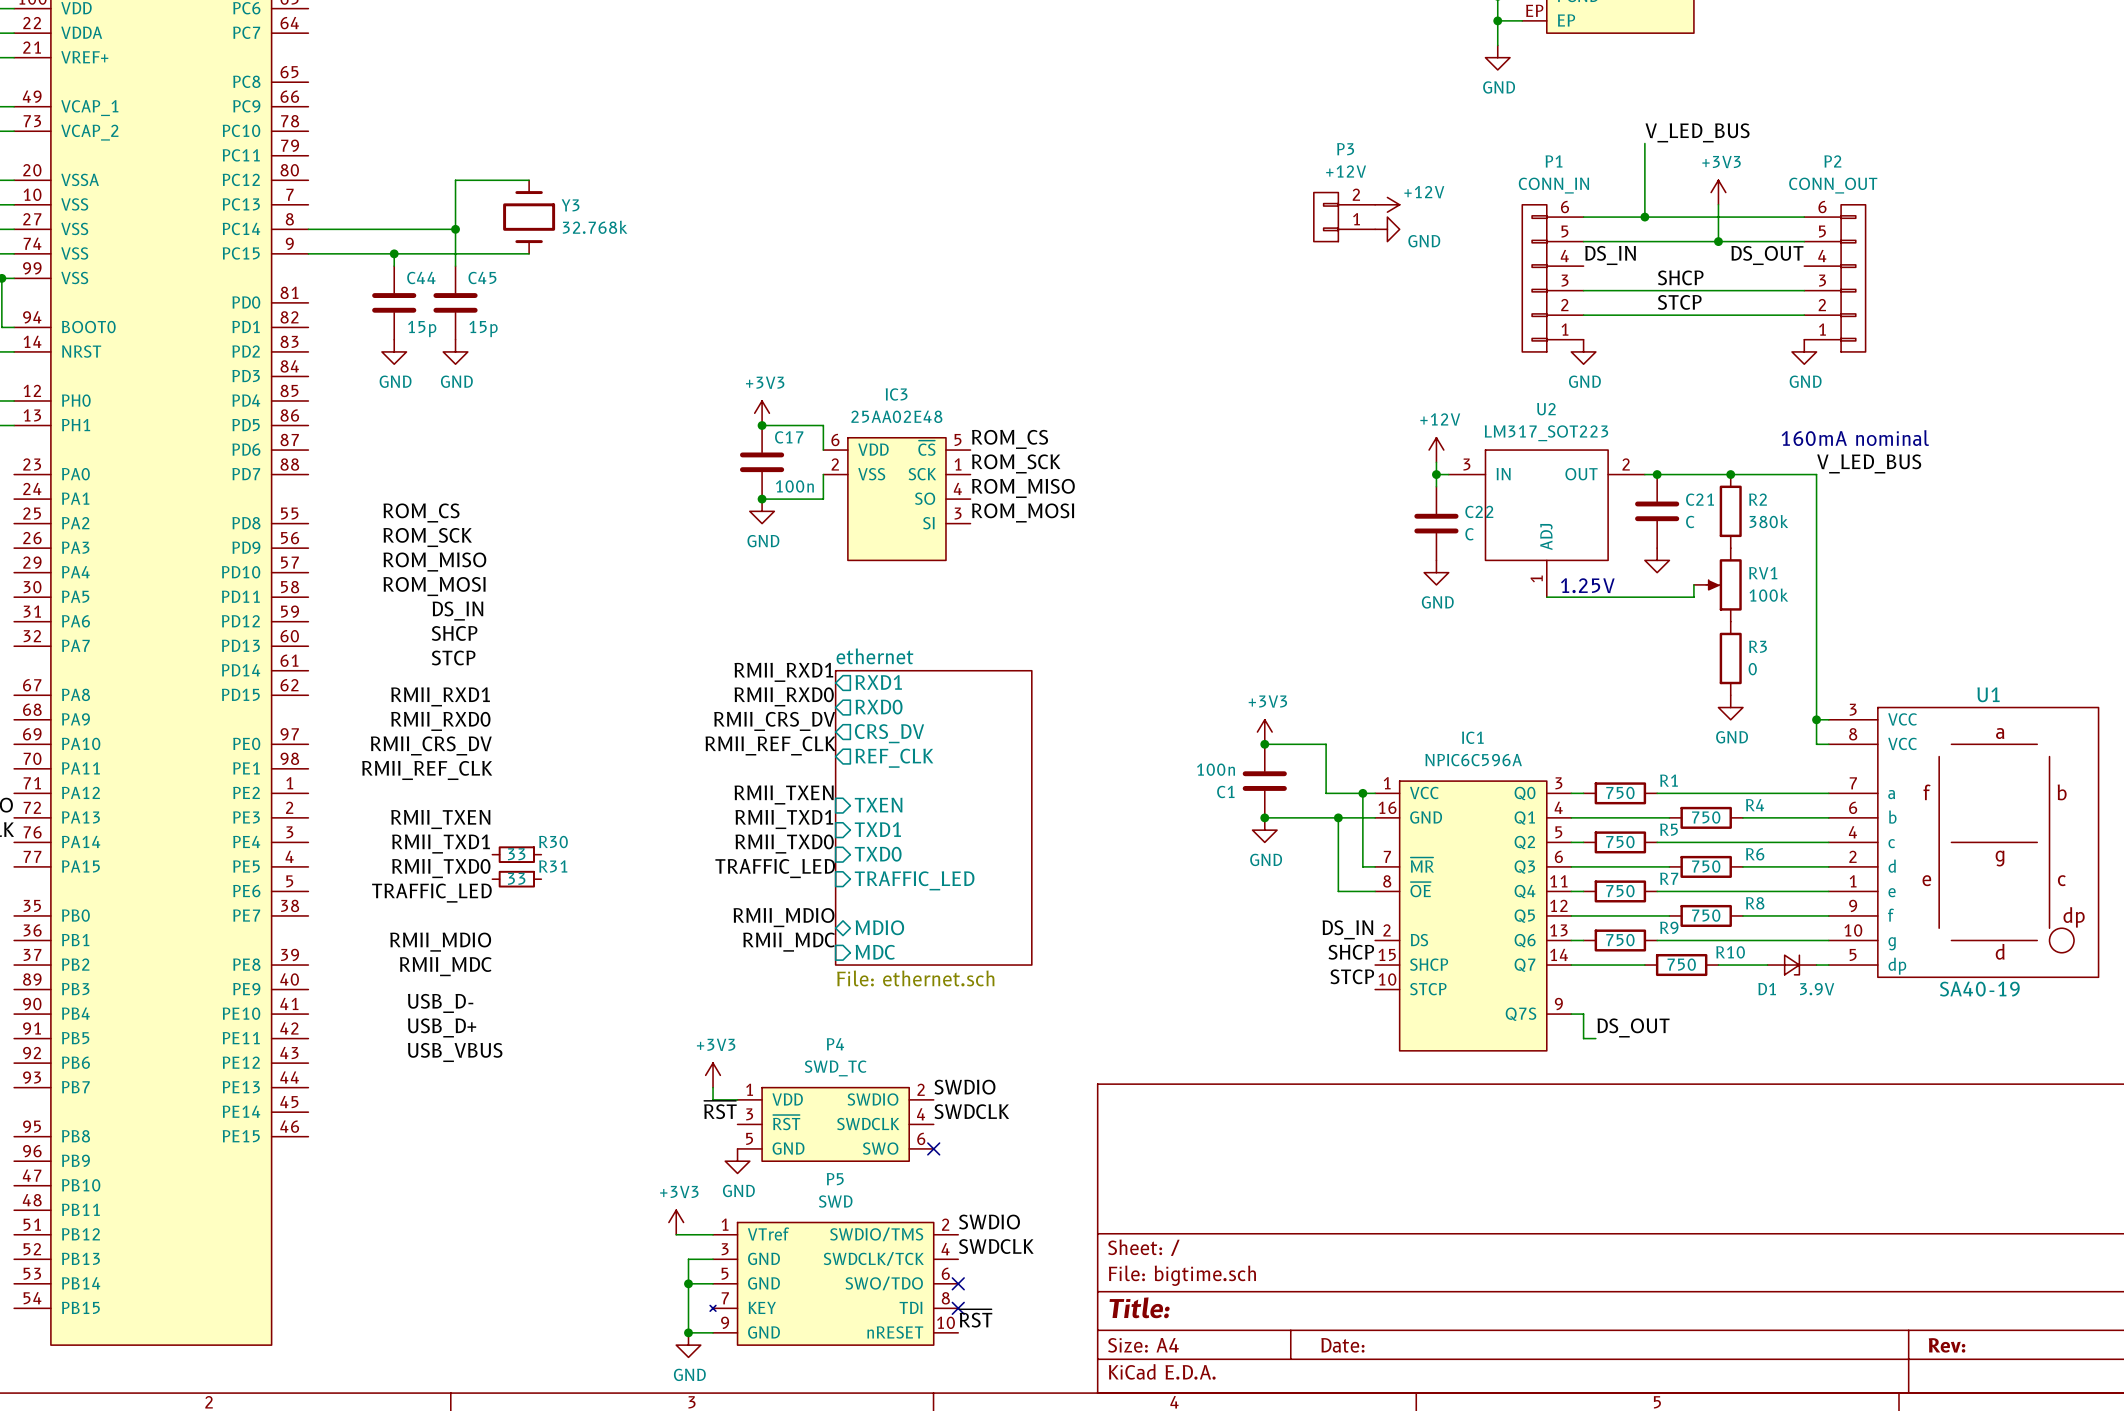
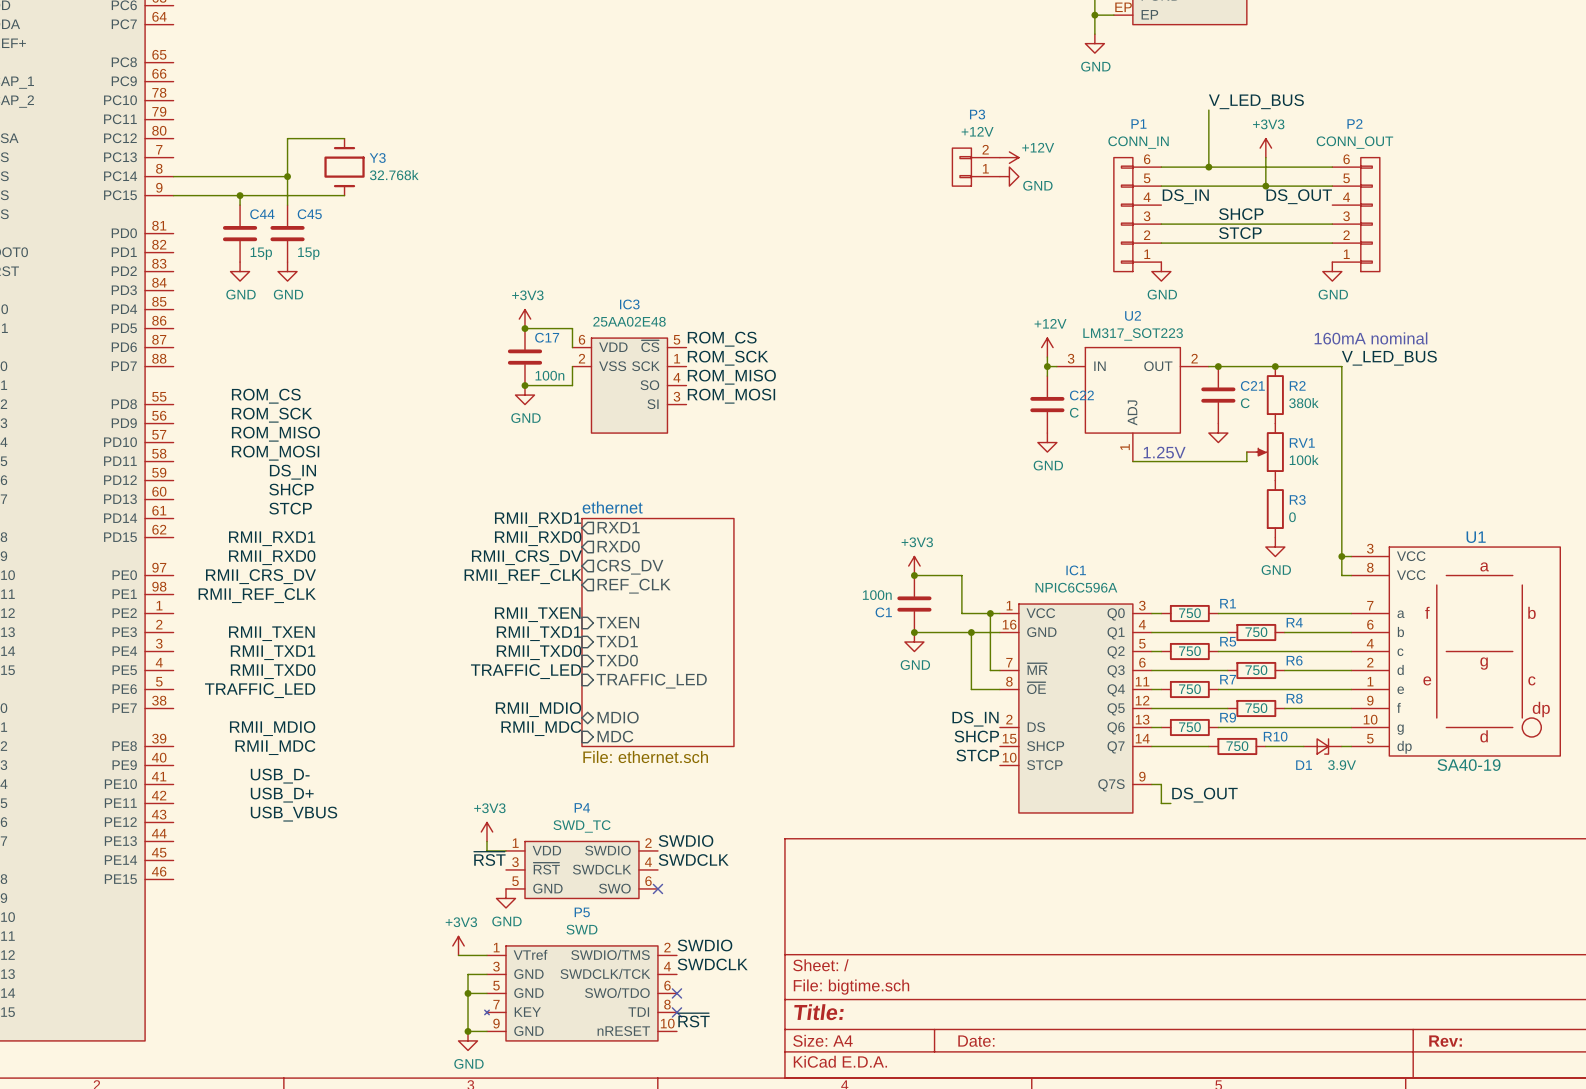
R30: 33 (516, 854) -> none
R31: 33 (516, 879) -> none

